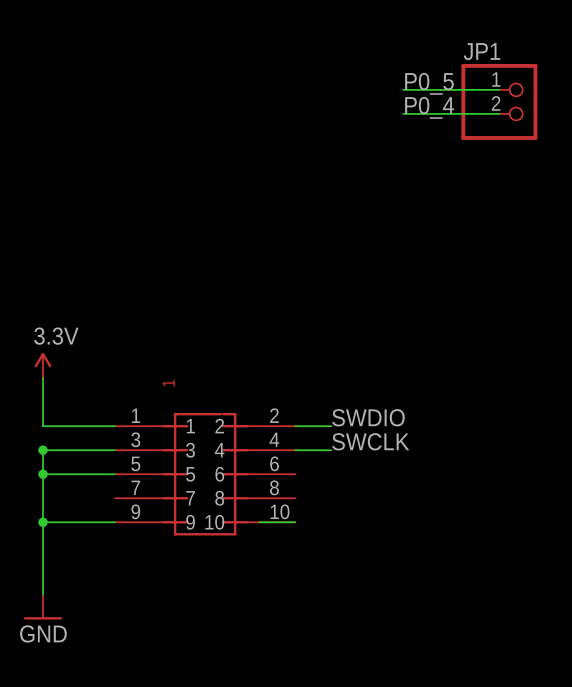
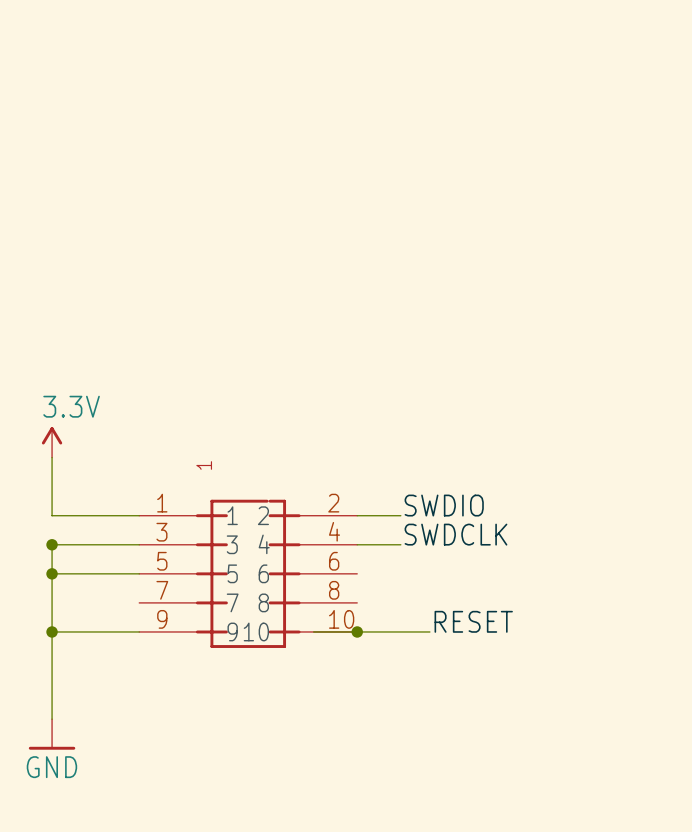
label: P0_5 (429, 83) -> none
wire: (403, 89) (499, 89) -> none
JP1: (499, 101) -> none
label: P0_4 (429, 107) -> none
wire: (403, 113) (499, 113) -> none
label: SWCLK (370, 441) -> SWDCLK (455, 534)
label: none -> RESET (473, 621)
wire: none -> (357, 631) (429, 631)
junction: none -> (357, 631)

